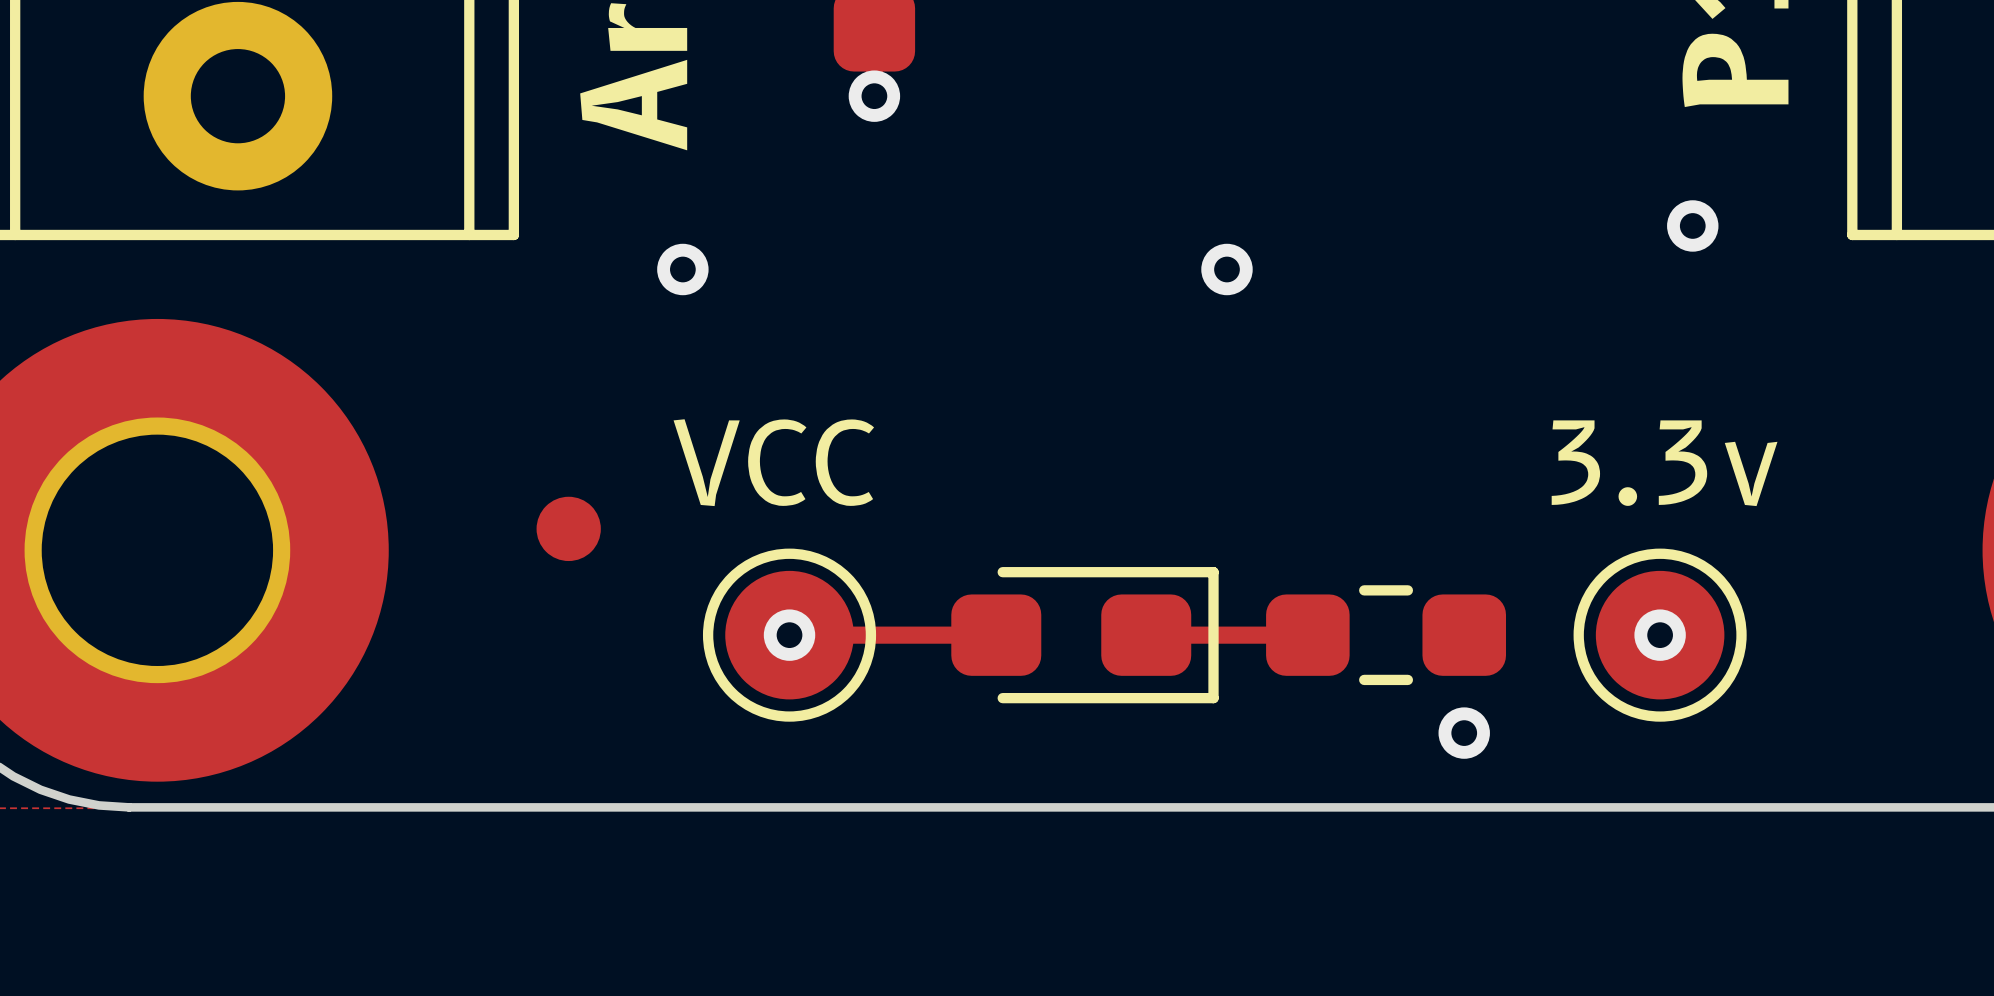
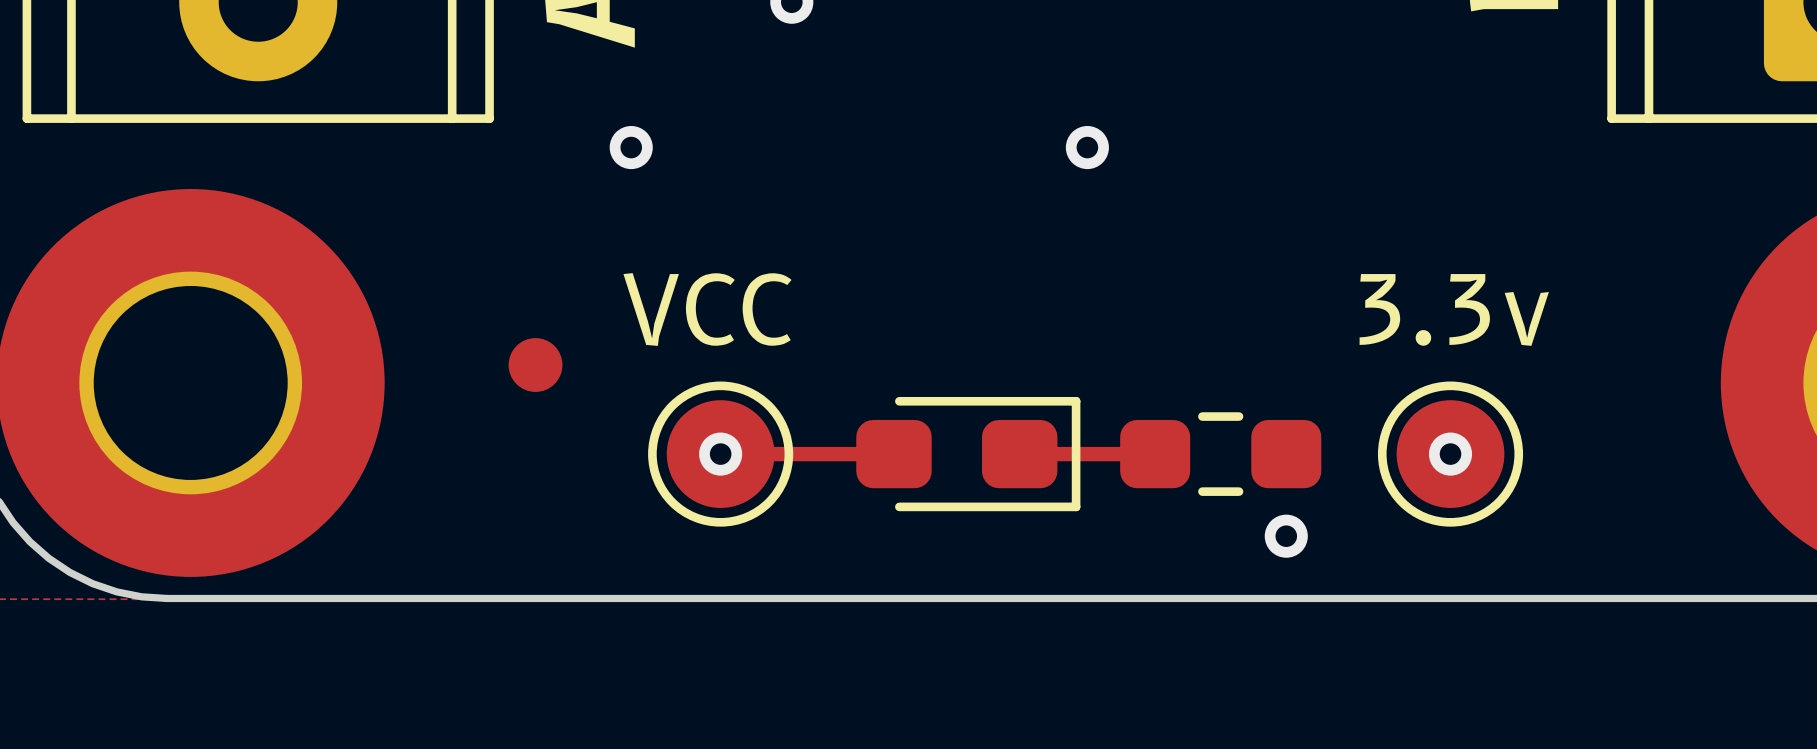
via: (1692, 225) -> none

